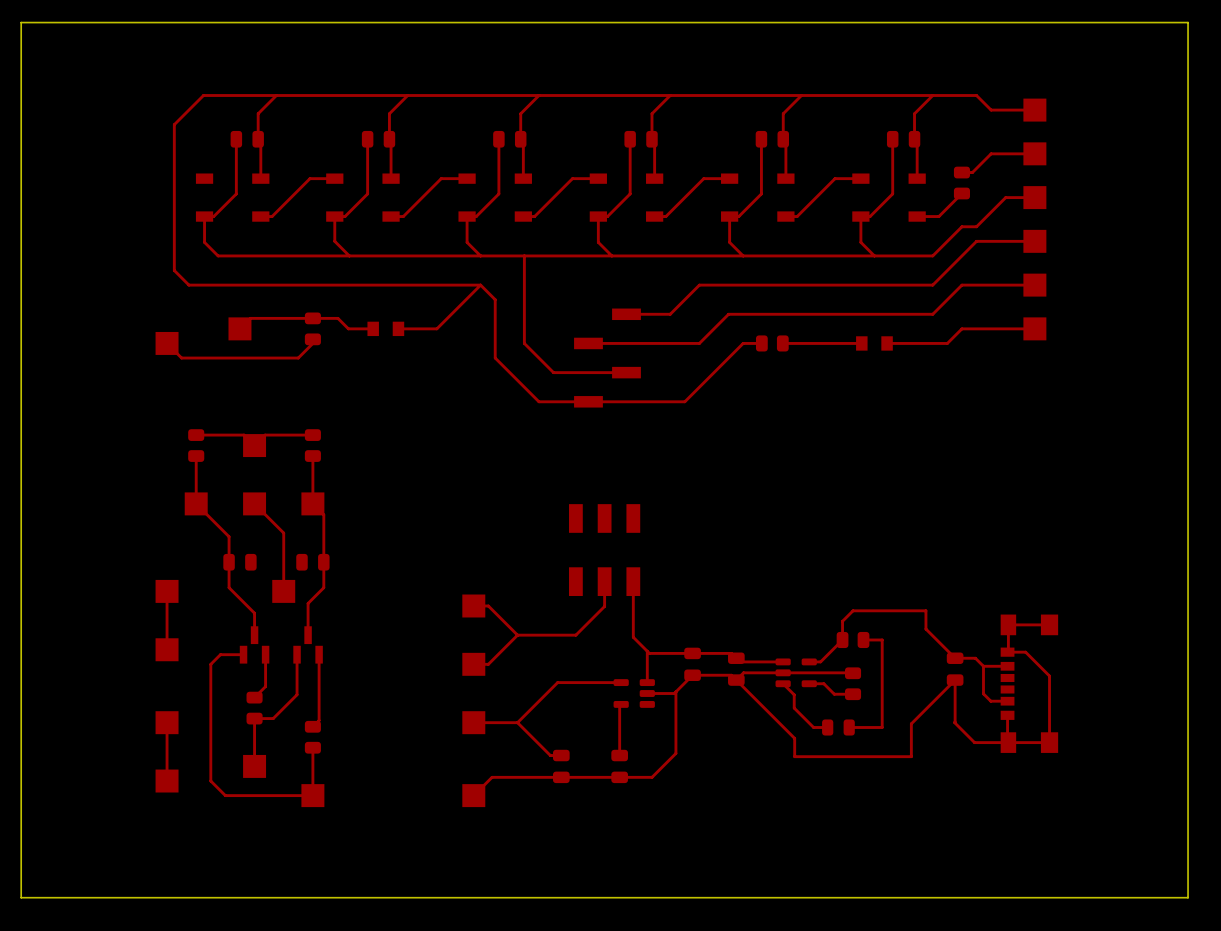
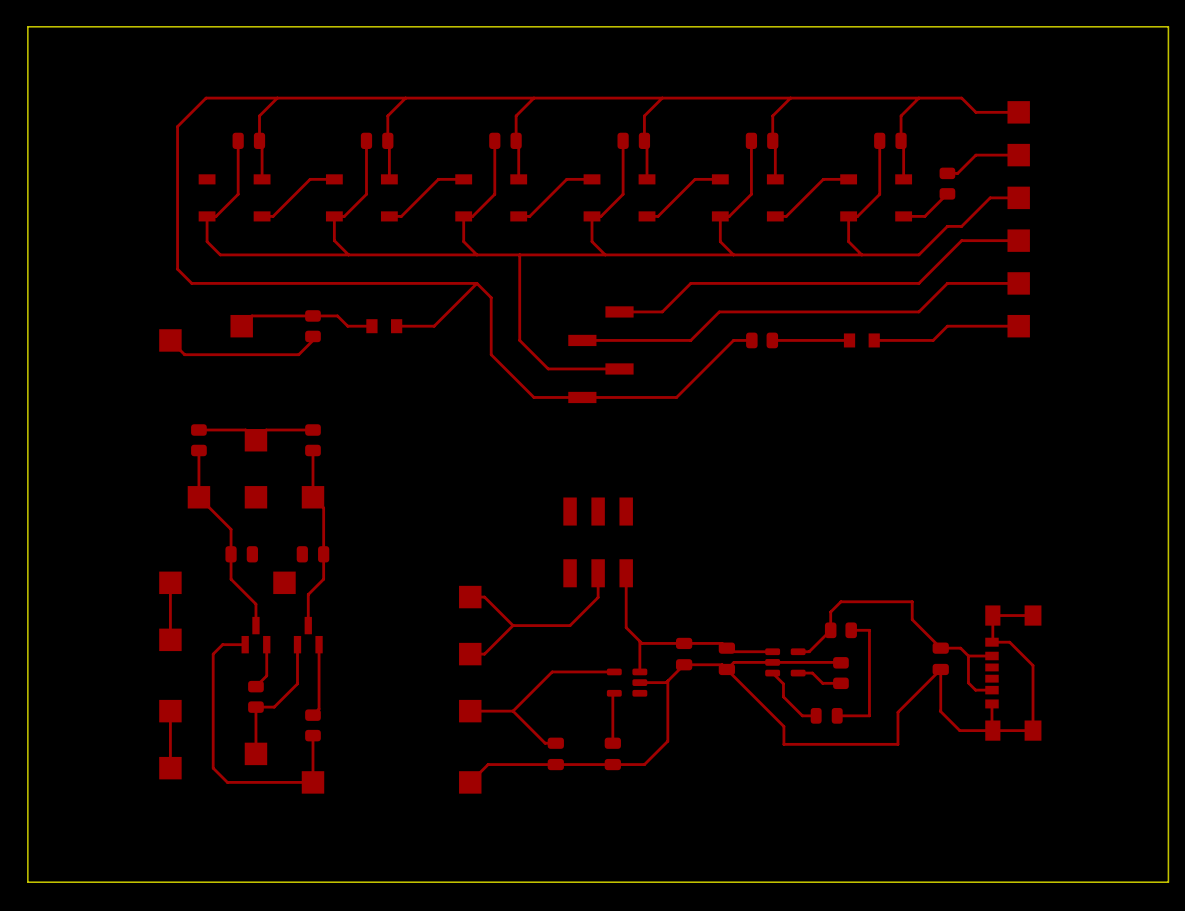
top track: (254, 503) (283, 533) (283, 591) -> none

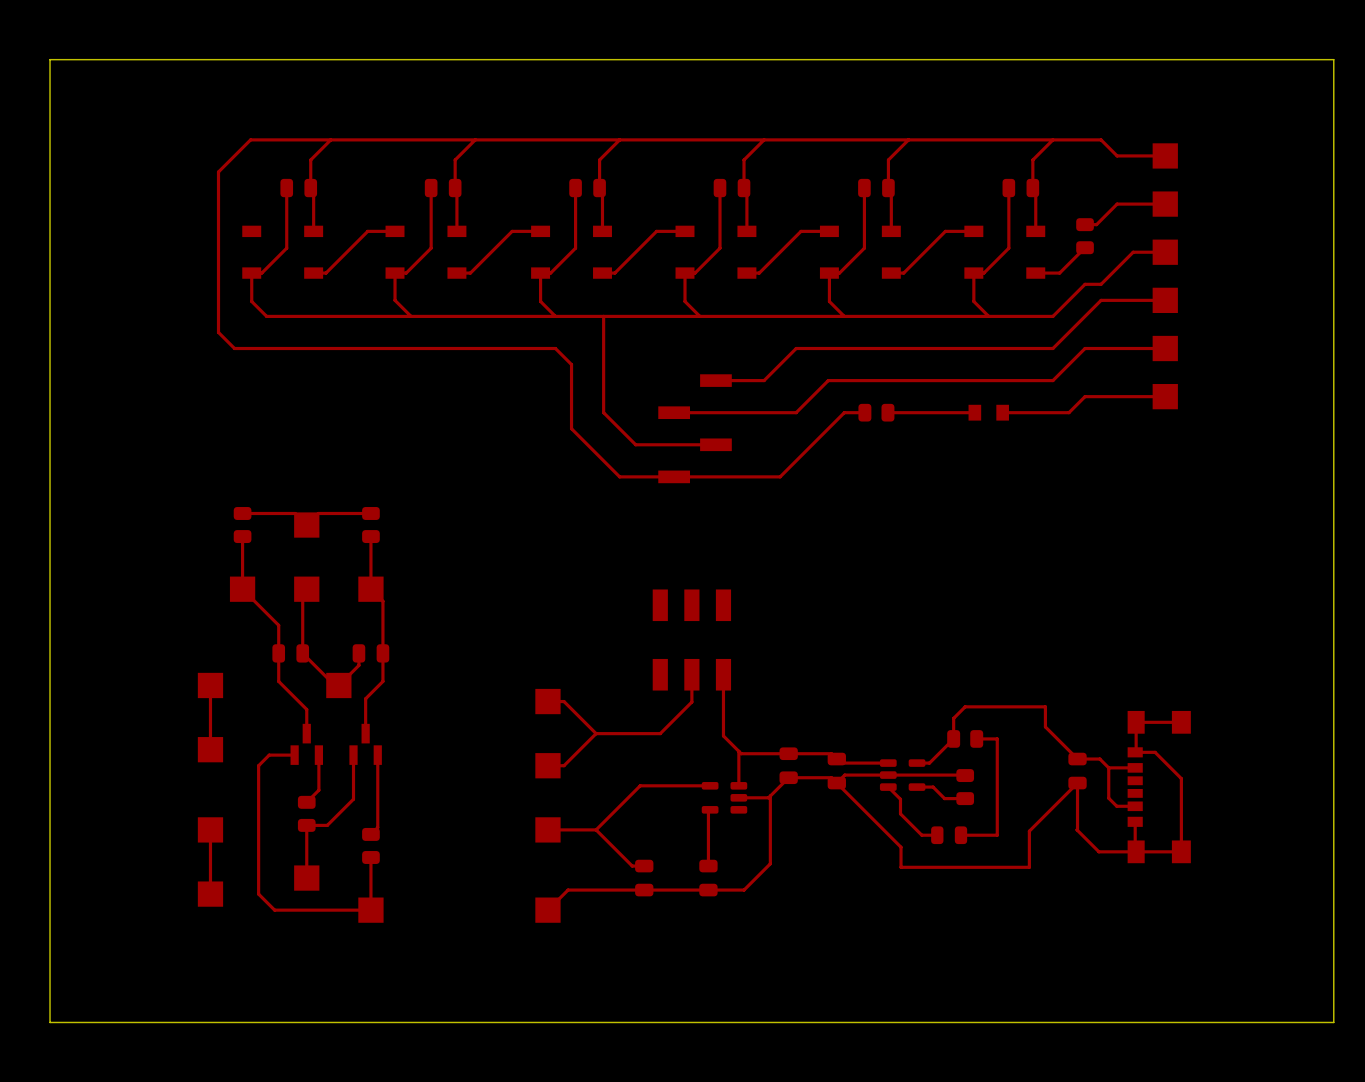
top track: (476, 283) (434, 326) (396, 326) -> none
part: (241, 326) -> none
part: (312, 326) -> none
top track: (371, 326) (347, 326) (337, 315) (251, 315) (241, 326) -> none
part: (384, 326) -> none
top track: (312, 336) (312, 340) (298, 354) (184, 354) (170, 340) -> none
part: (170, 340) -> none
top track: none -> (306, 589) (302, 593) (302, 653) (334, 685) (338, 685) (358, 665) (358, 653)

